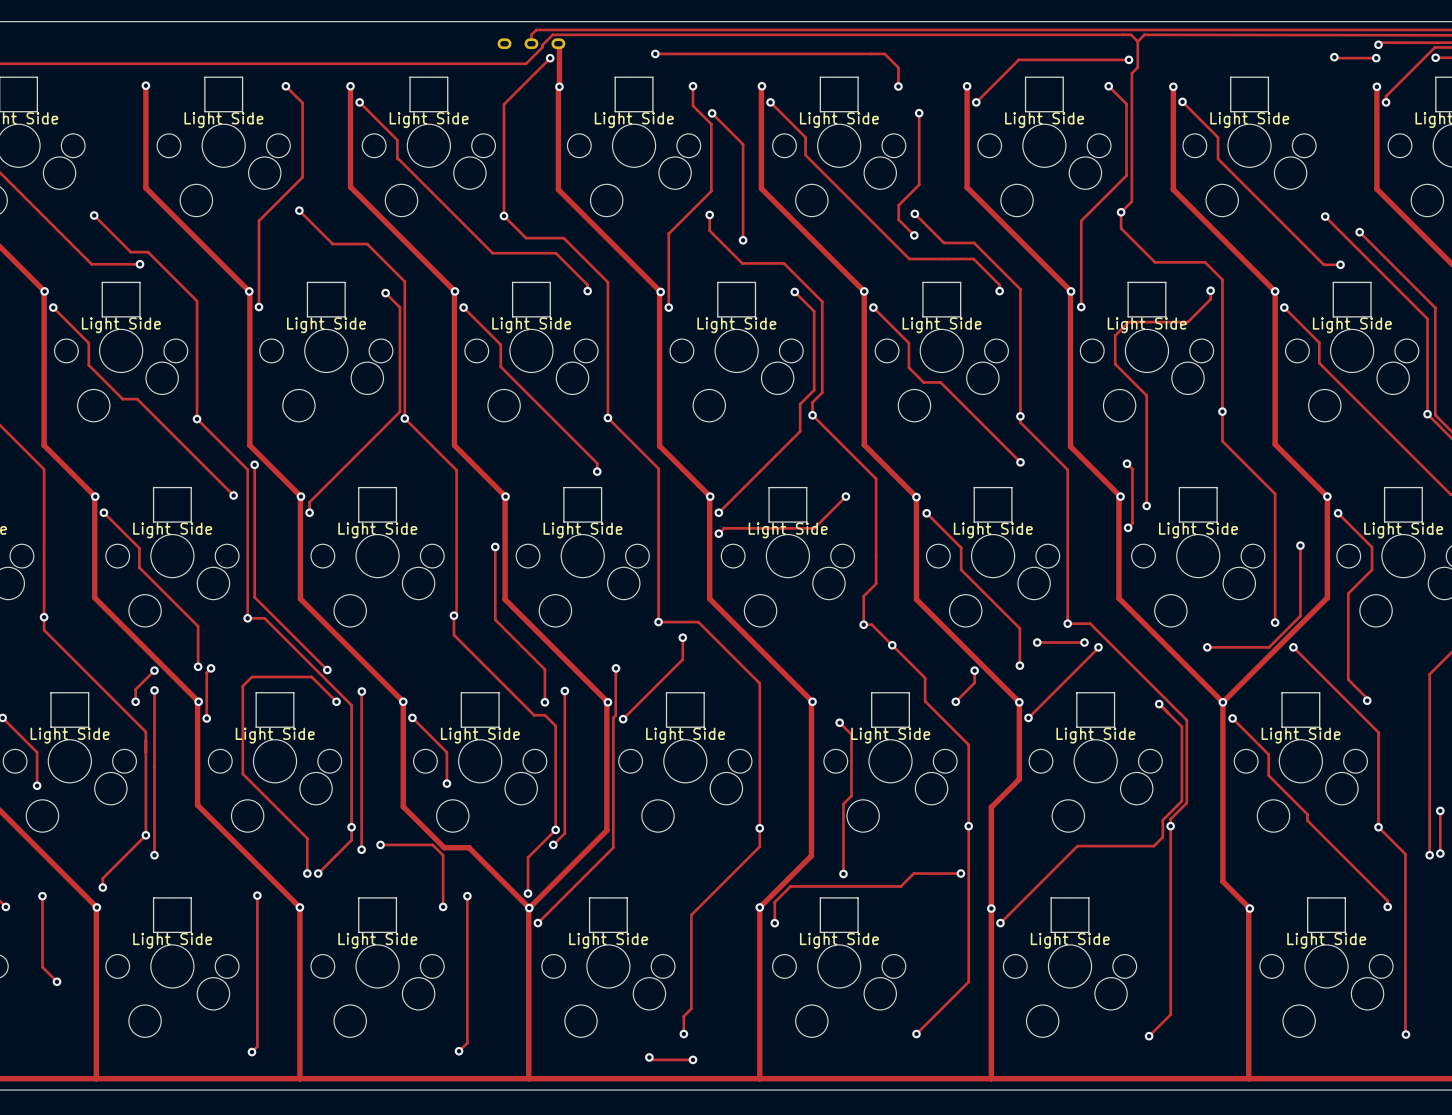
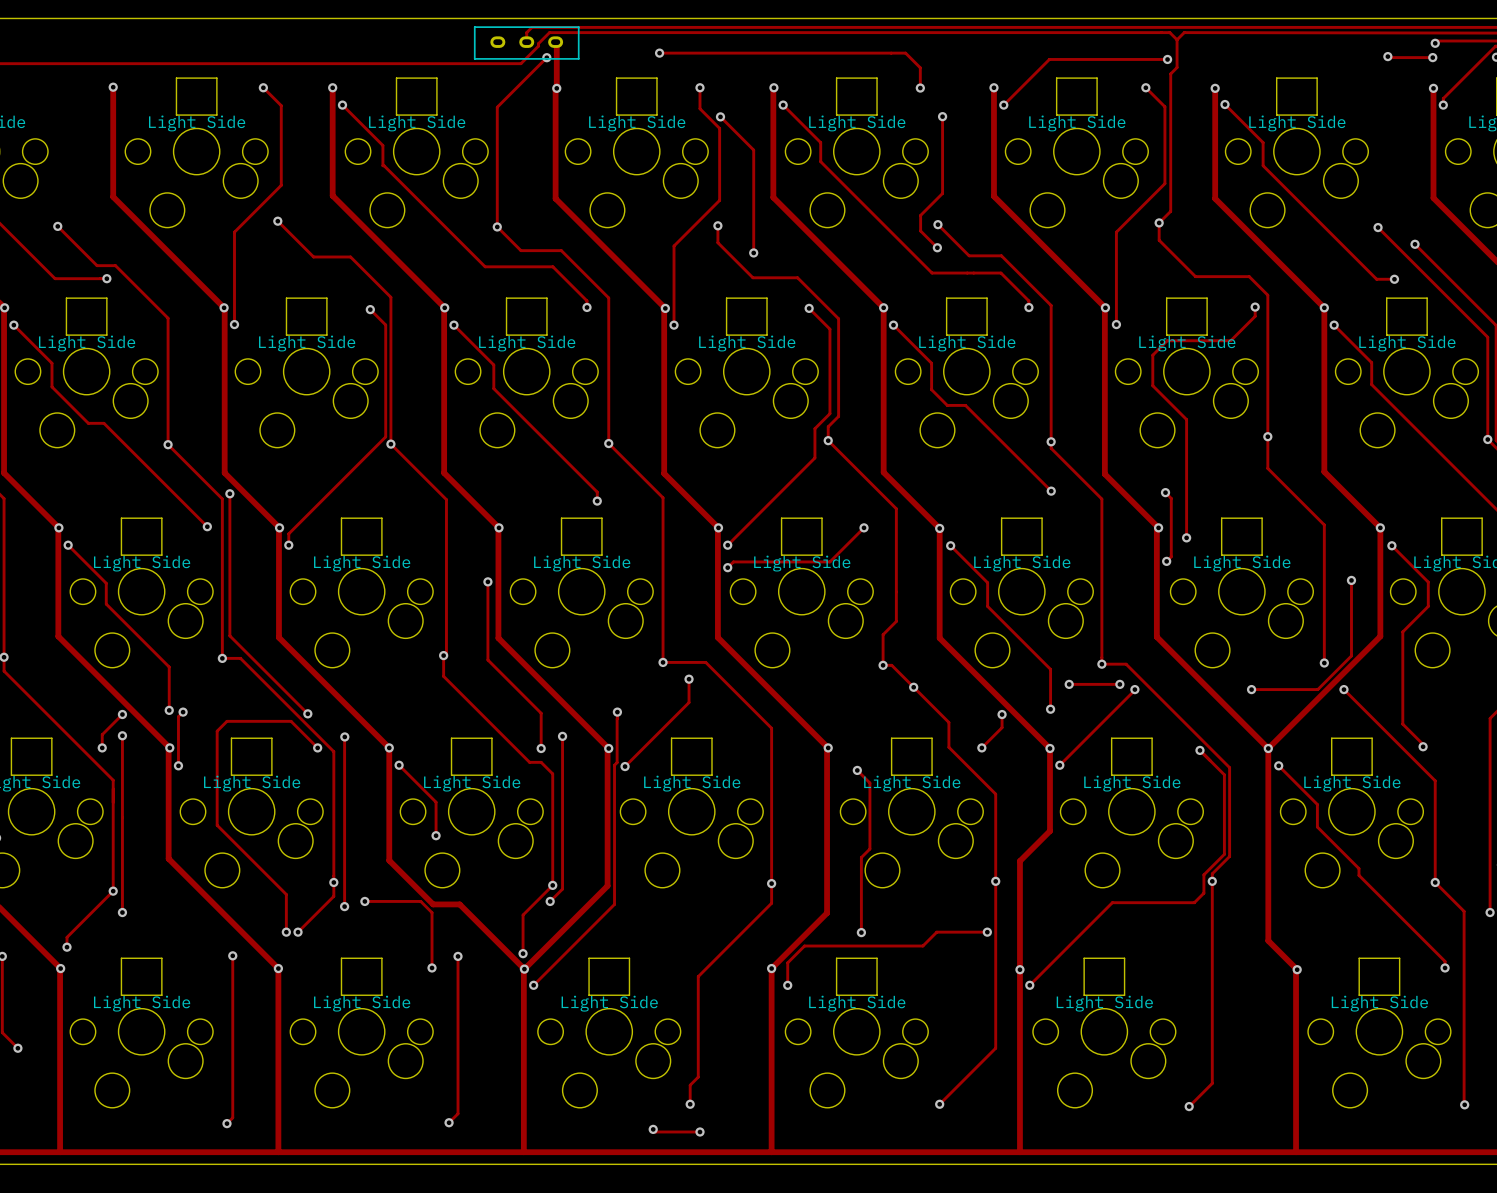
part side: bottom (531, 43) -> top (526, 43)

